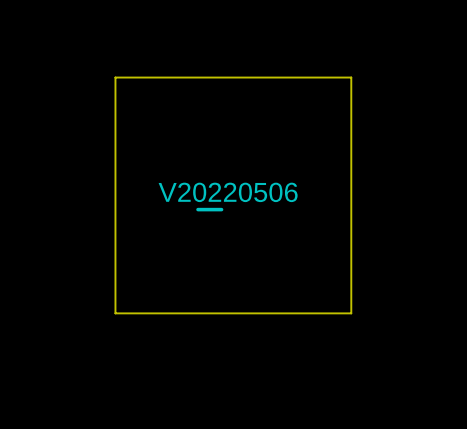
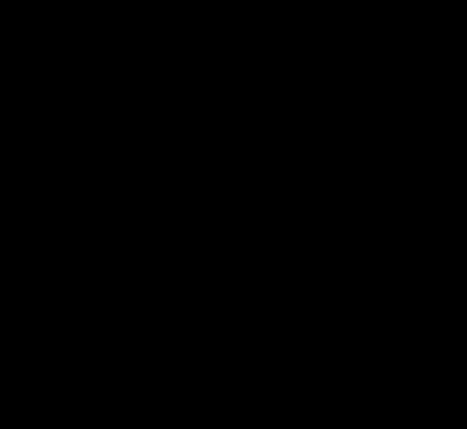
board edge: (115, 77) (351, 77) (351, 313) (115, 313) (115, 77) -> none
drawing: [196, 207, 224, 212] -> none

